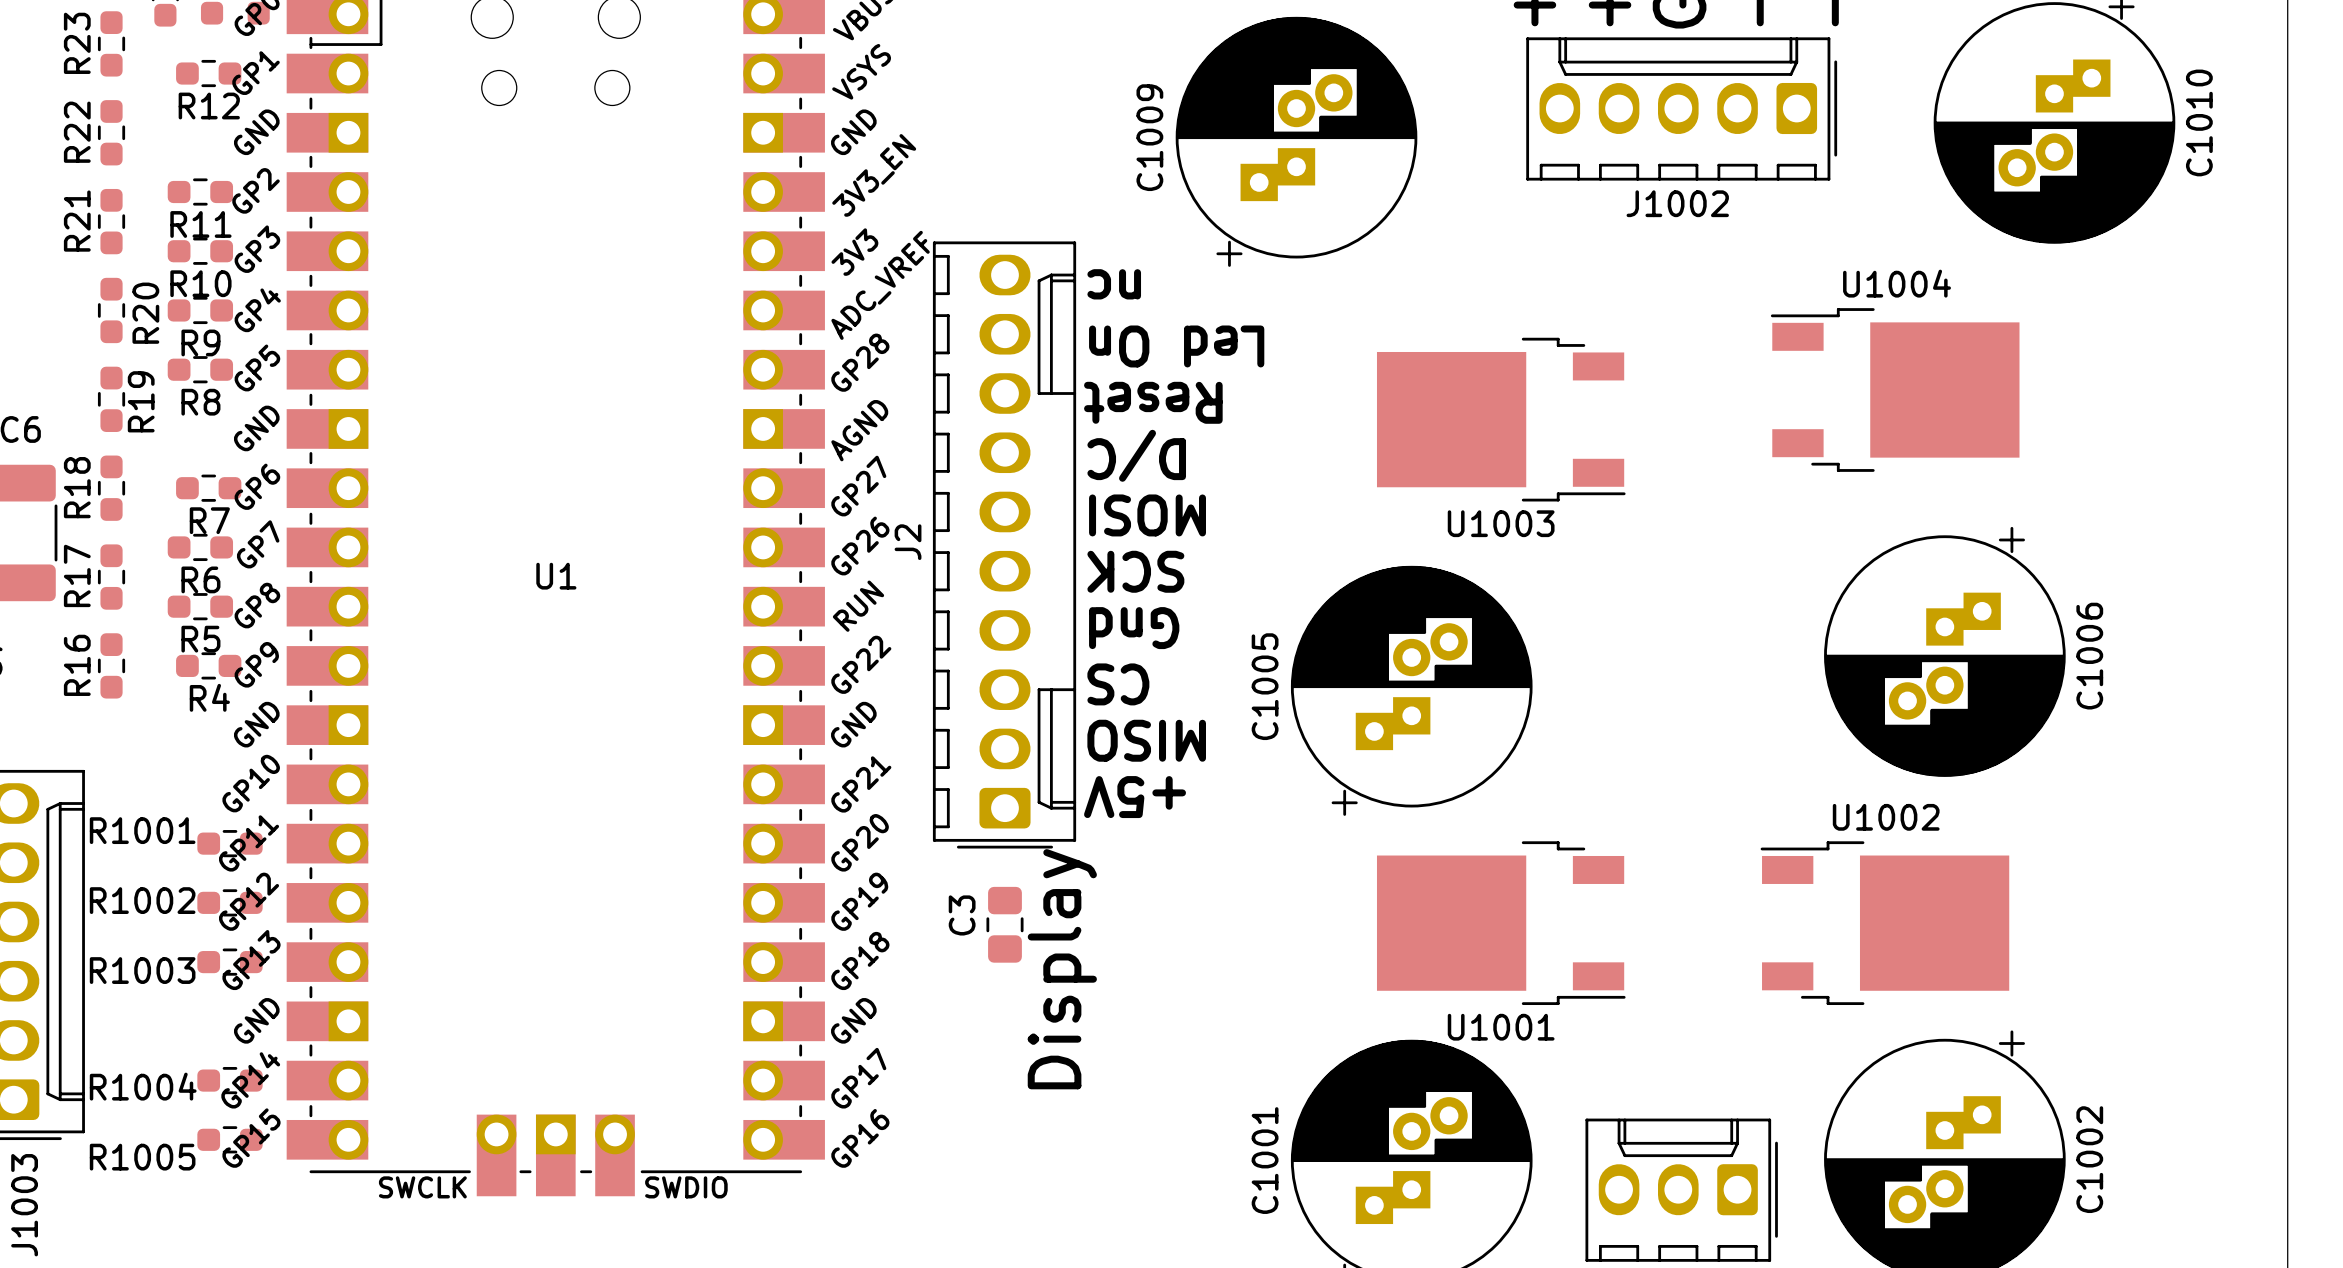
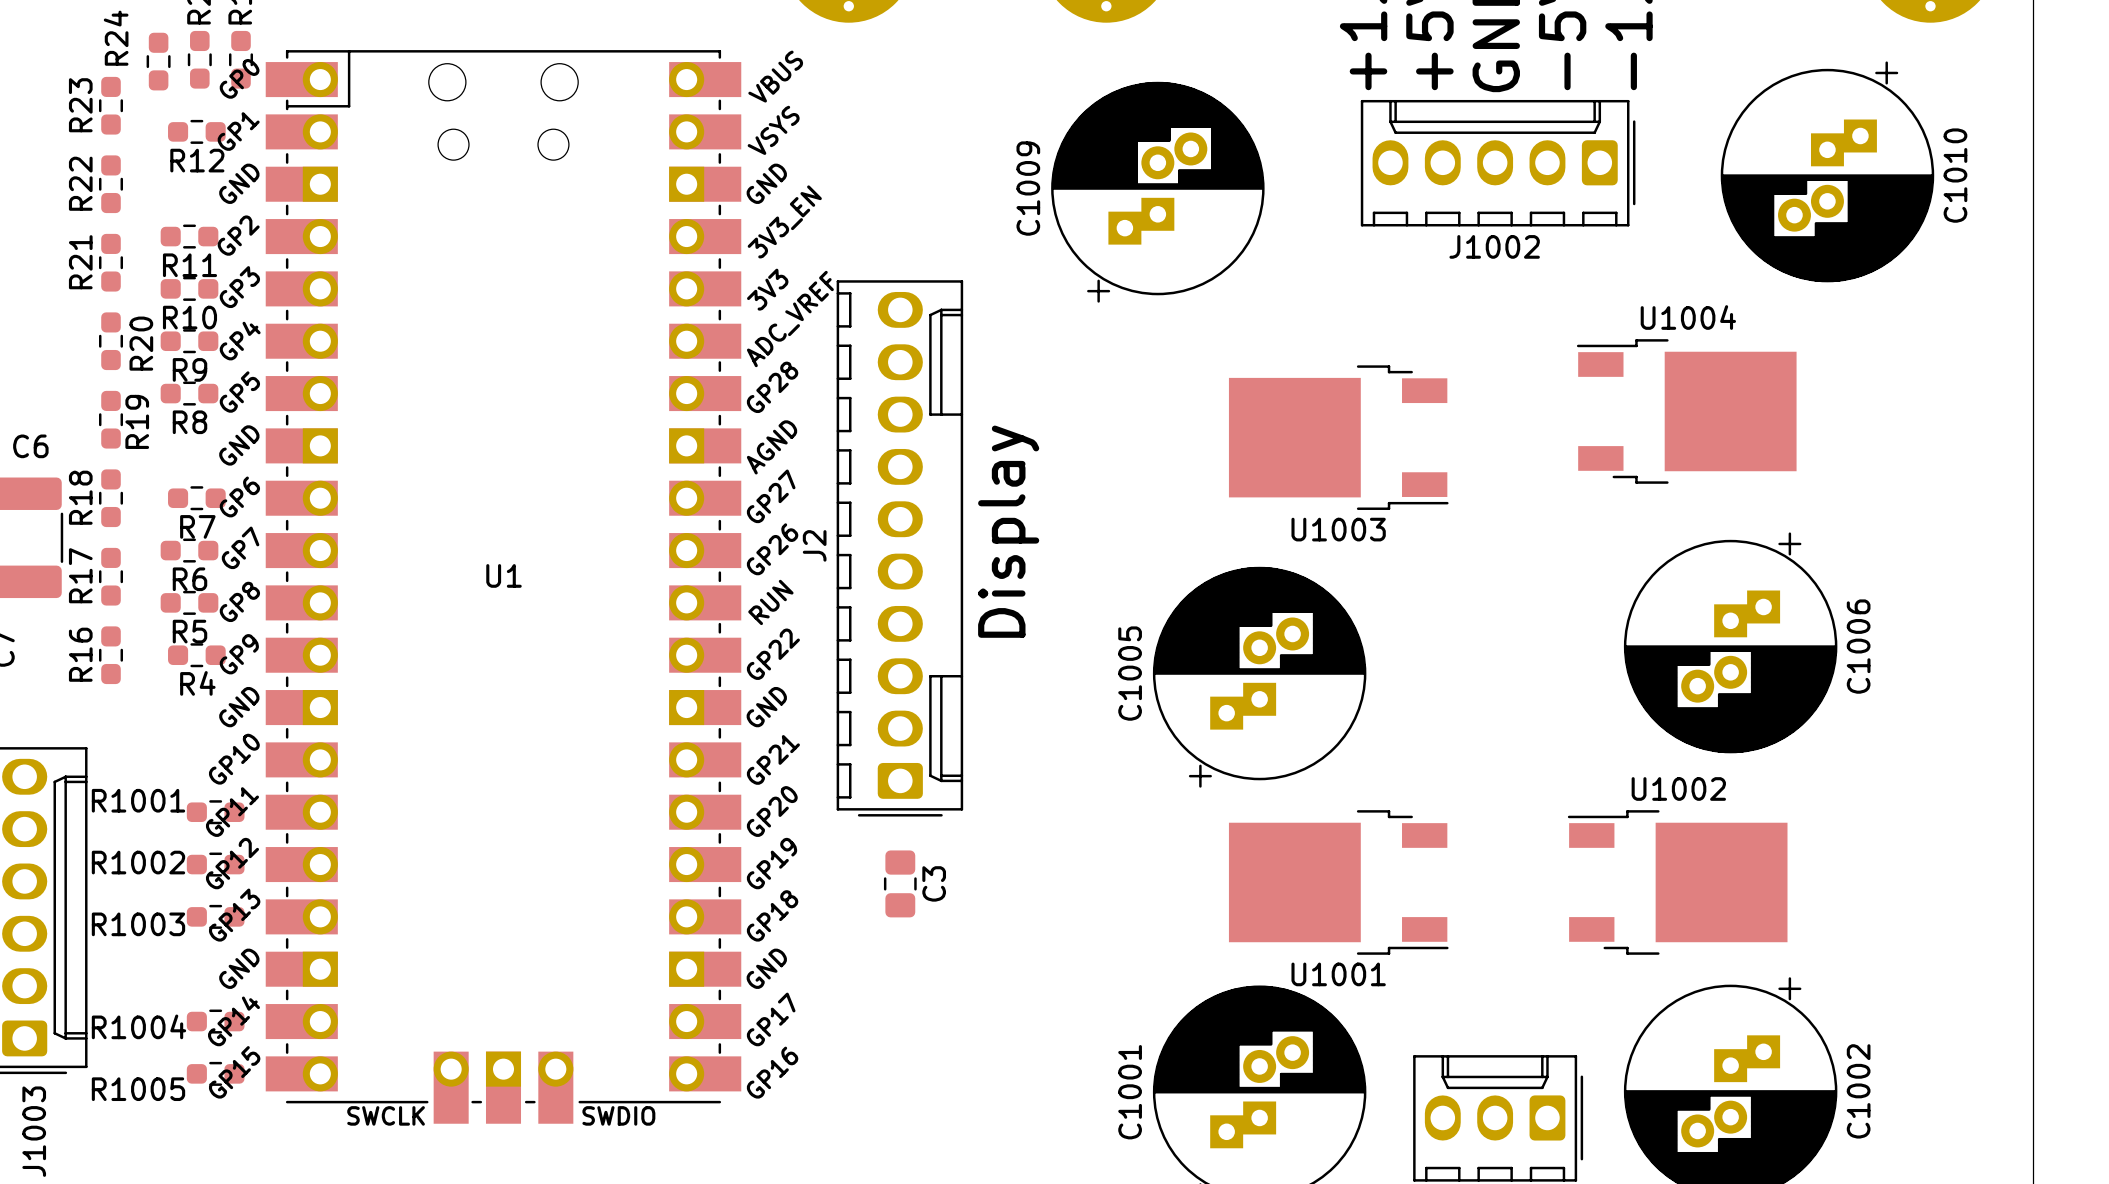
text: nc (1114, 284) -> none
text: Led On (1176, 346) -> none
text: Reset (1153, 402) -> none
text: D/C (1136, 455) -> none
text: MOSI (1147, 515) -> none
text: SCK (1135, 571) -> none
text: Gnd (1134, 628) -> none
text: CS (1118, 684) -> none
text: MISO (1146, 740) -> none
text: +5V (1135, 797) -> none
C3 name position: C3 (962, 915) -> C3 (934, 883)
text position: Display (1062, 969) -> Display (1008, 531)

